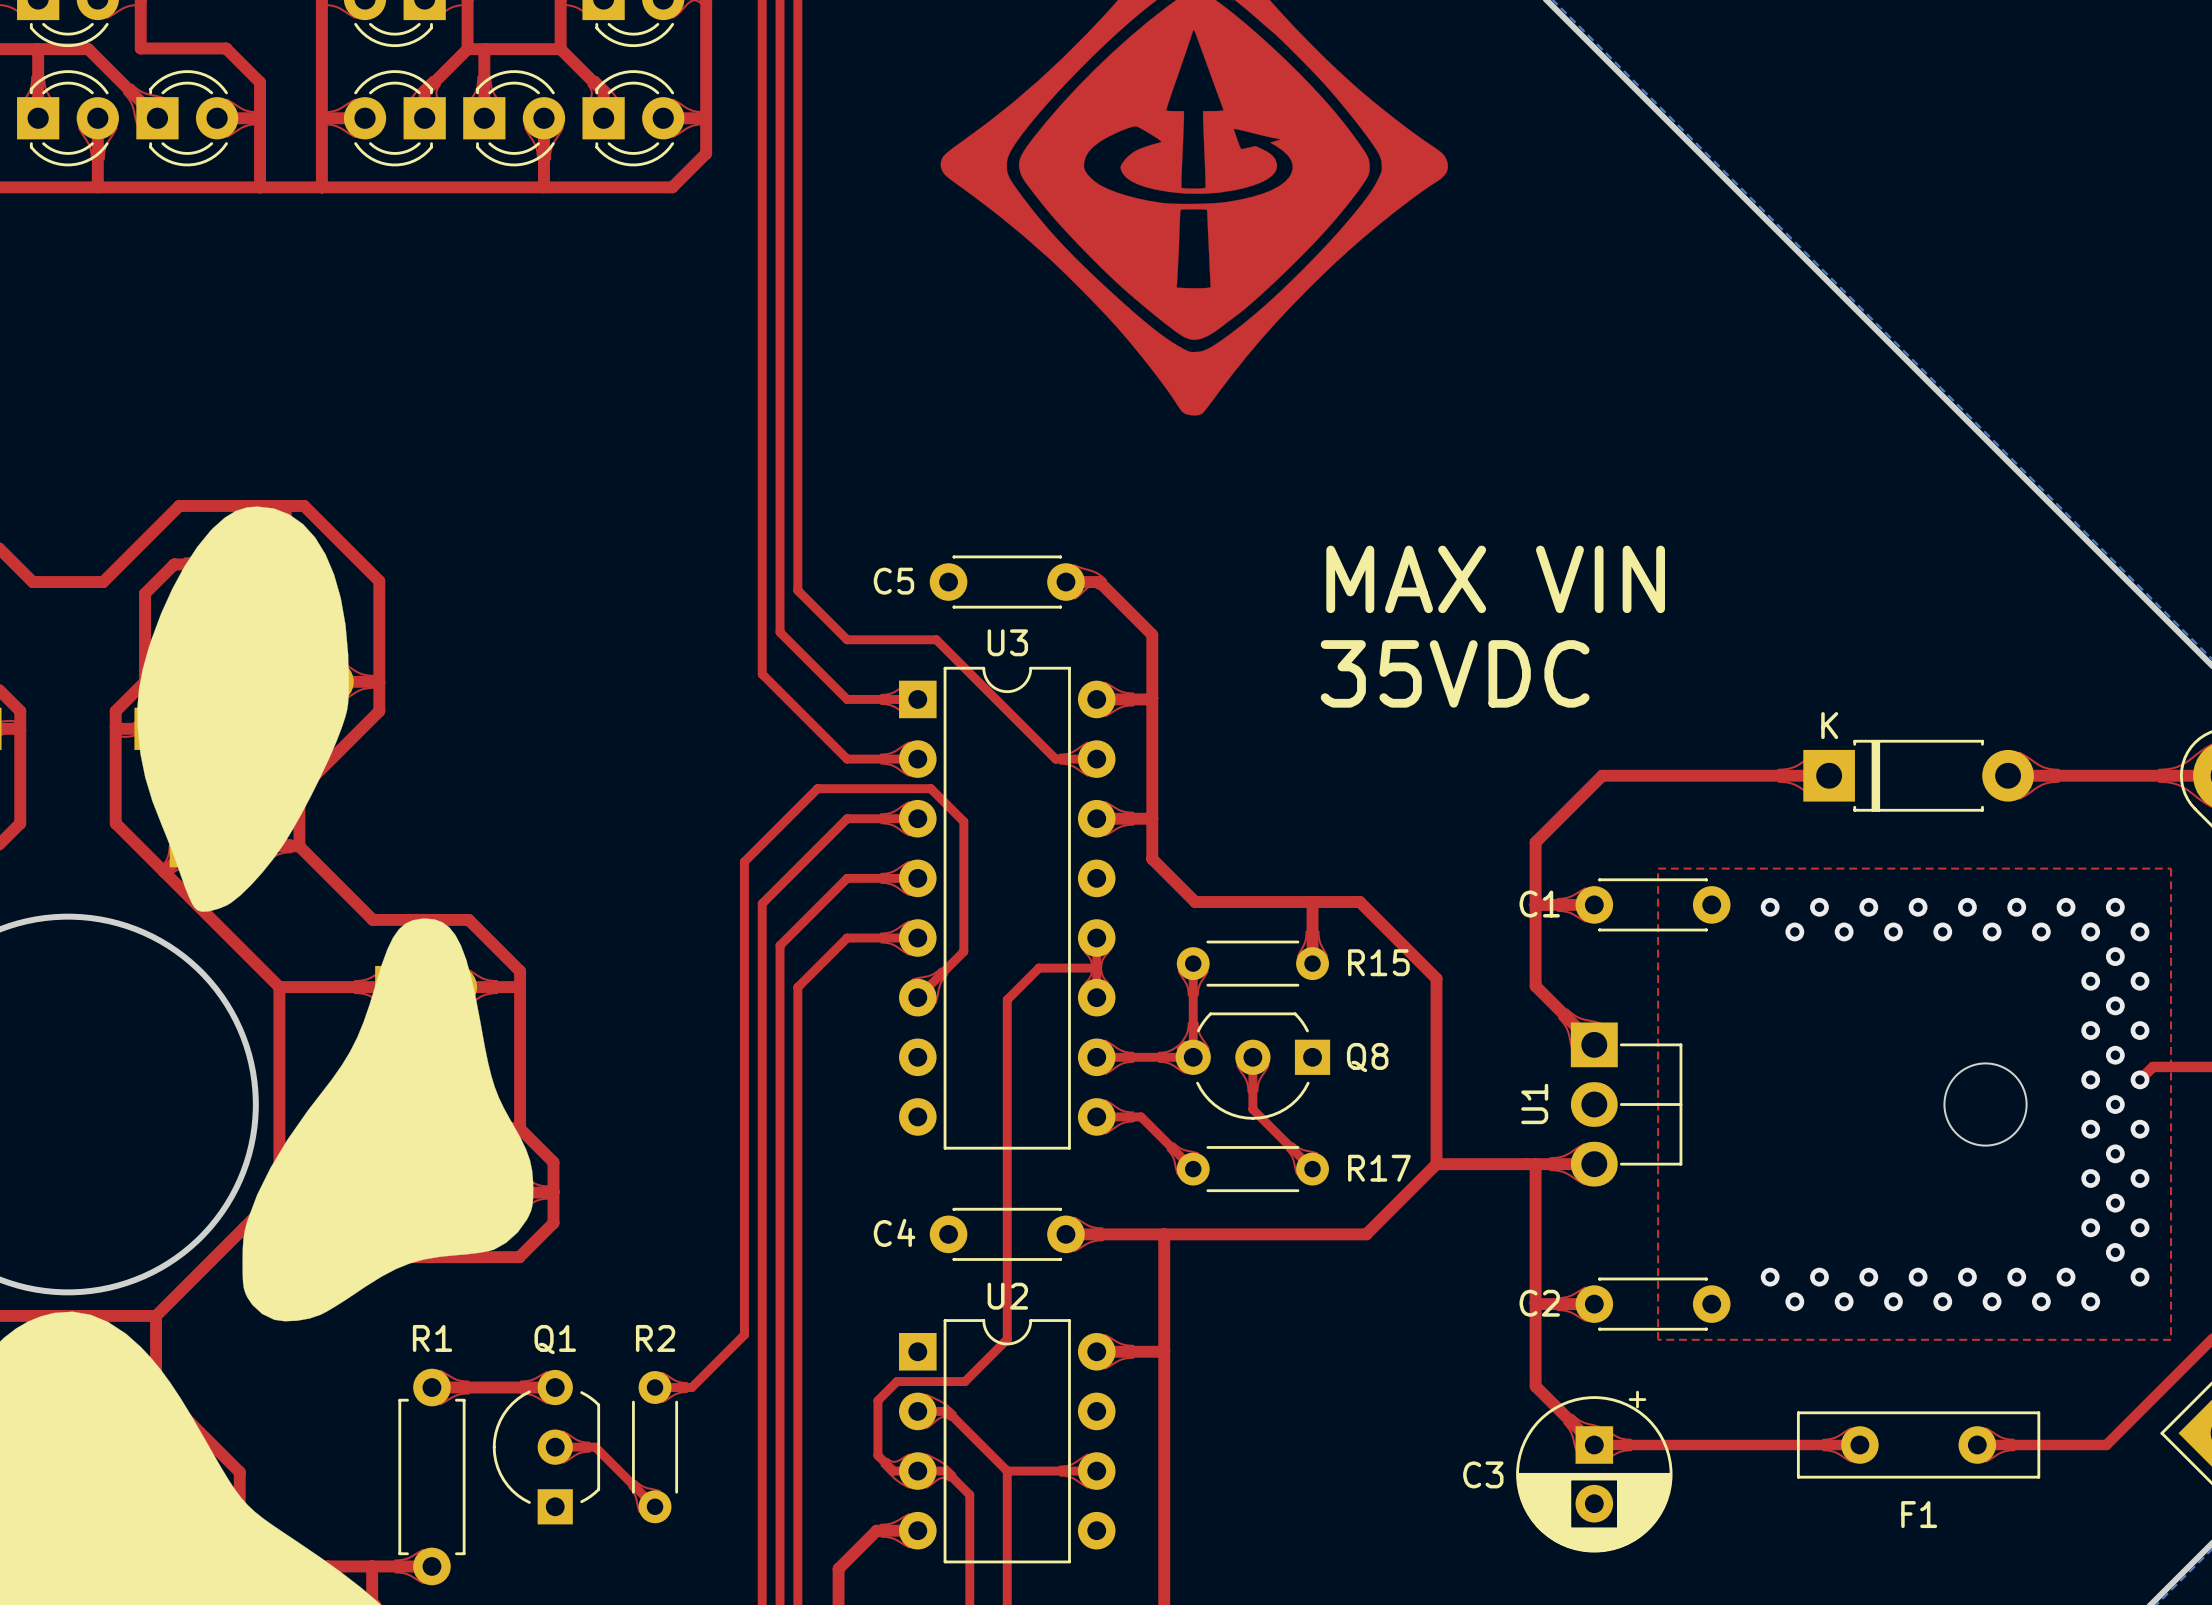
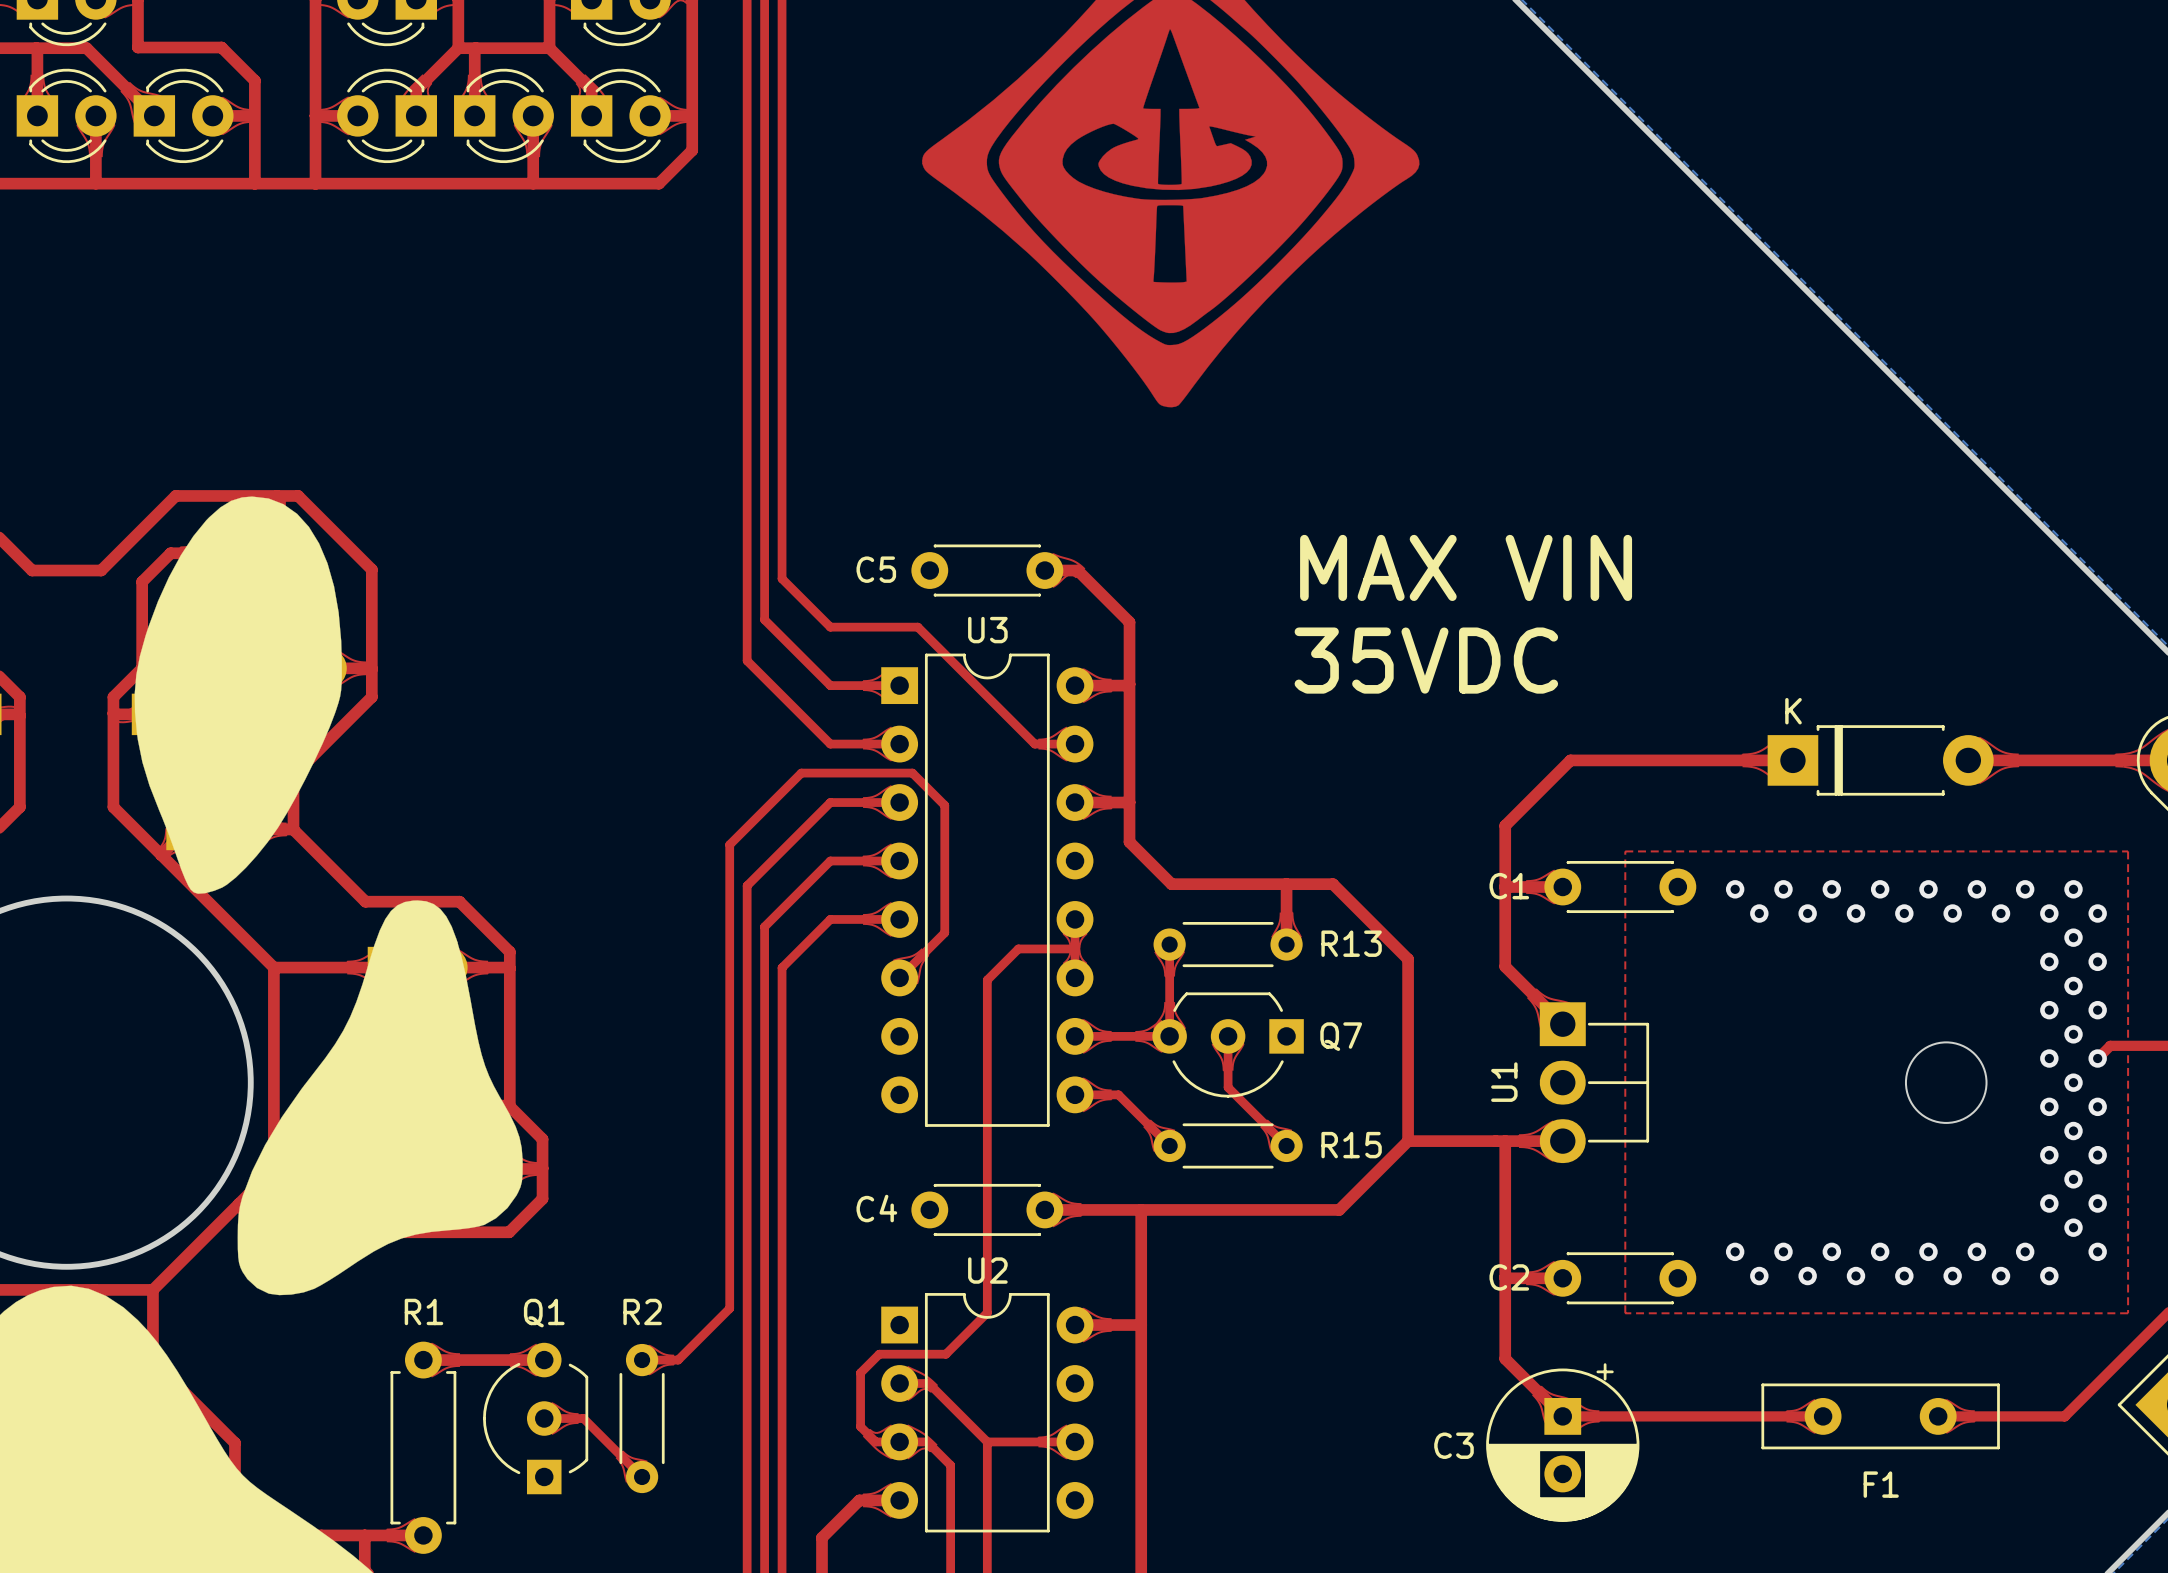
R15 name: R15 (1378, 962) -> R13 (1351, 943)
Q8 name: Q8 (1367, 1057) -> Q7 (1341, 1036)
R17 name: R17 (1379, 1168) -> R15 (1351, 1145)

